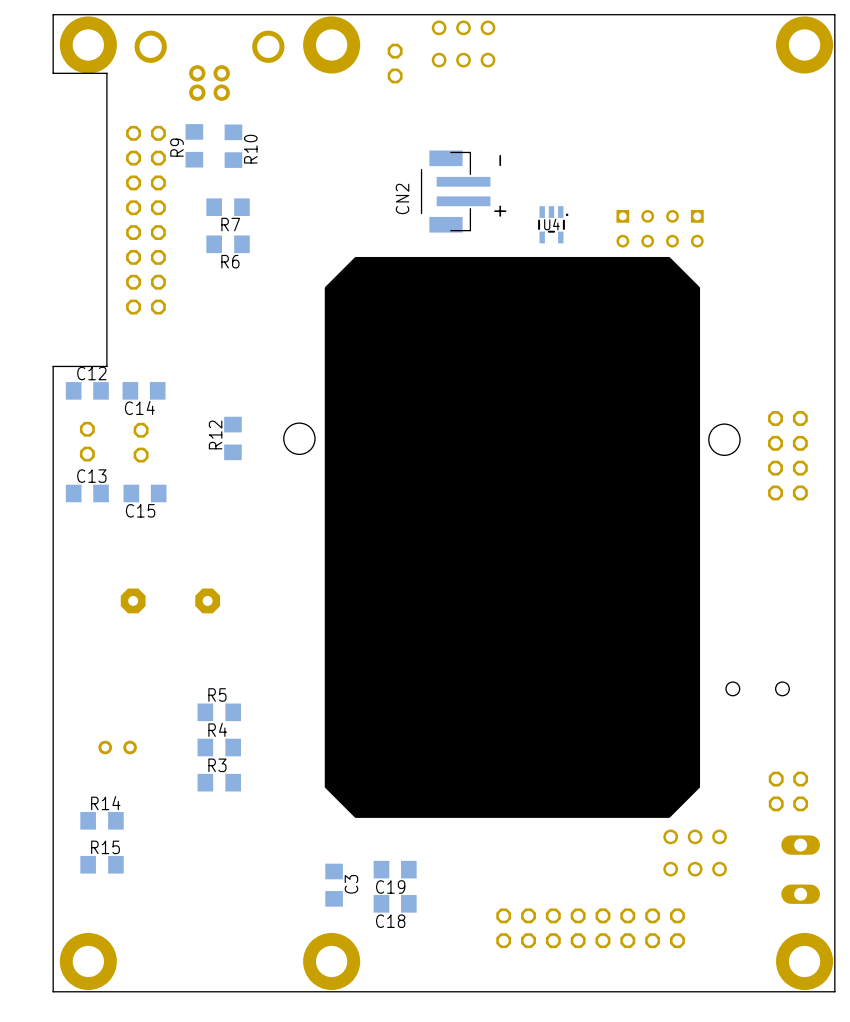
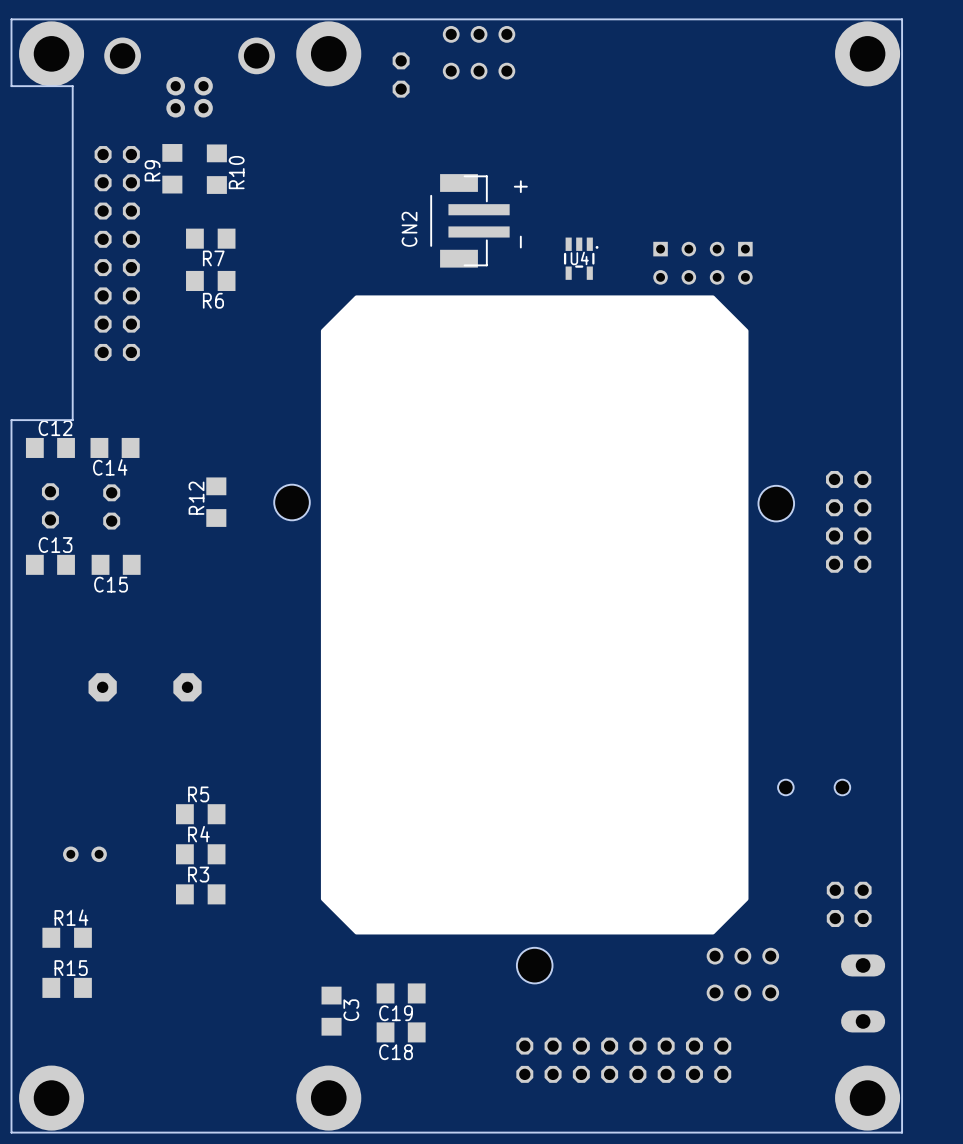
CN2 text position: - (500, 160) -> - (520, 242)
CN2 text position: + (500, 211) -> + (520, 186)
hole: none -> (534, 965)

